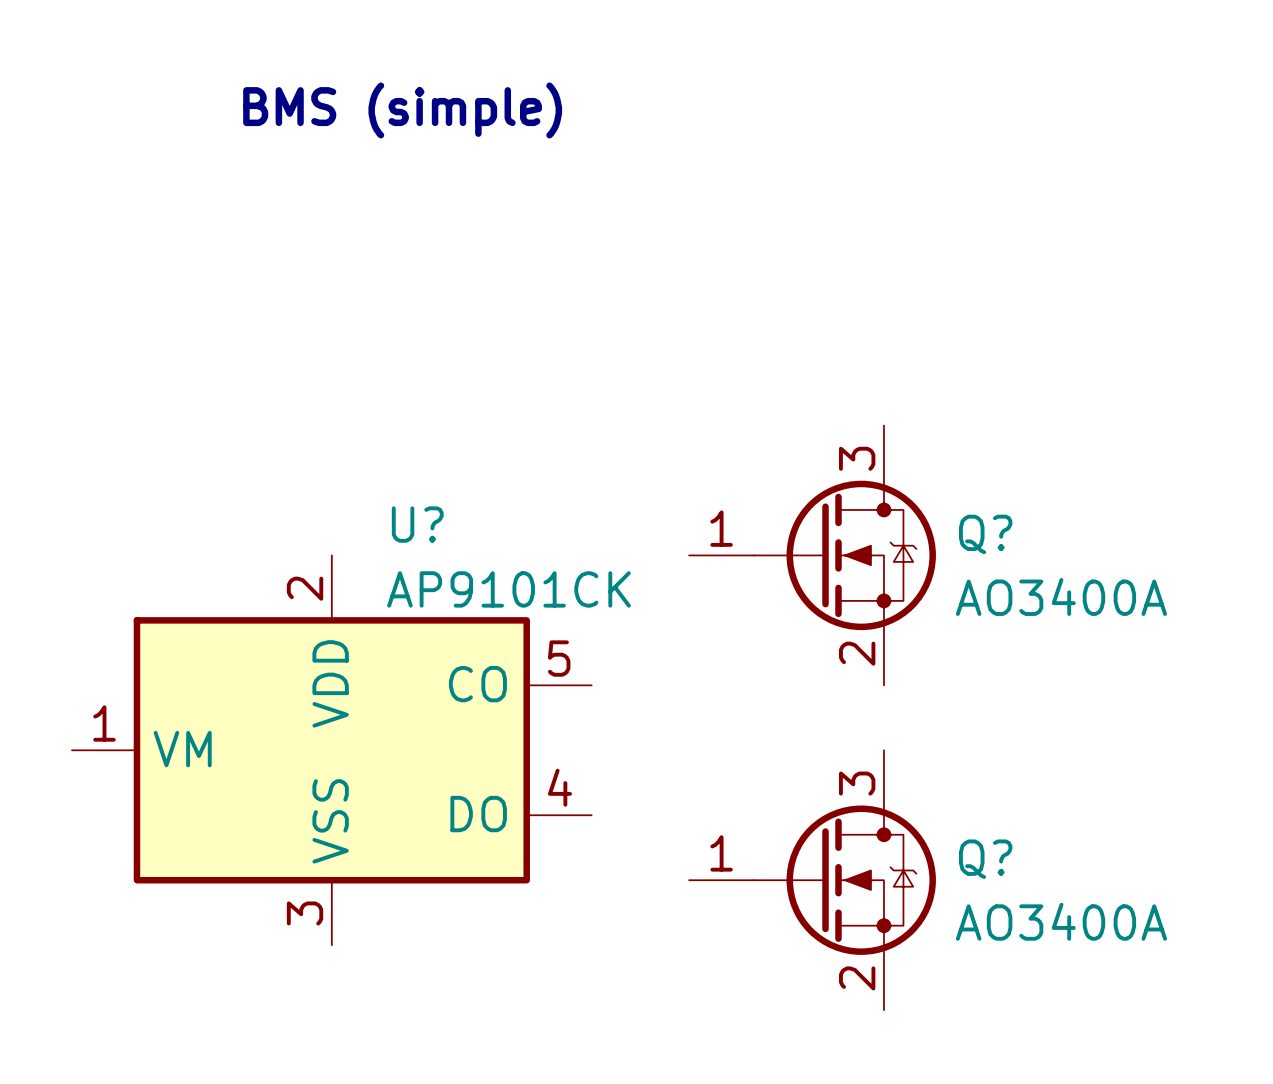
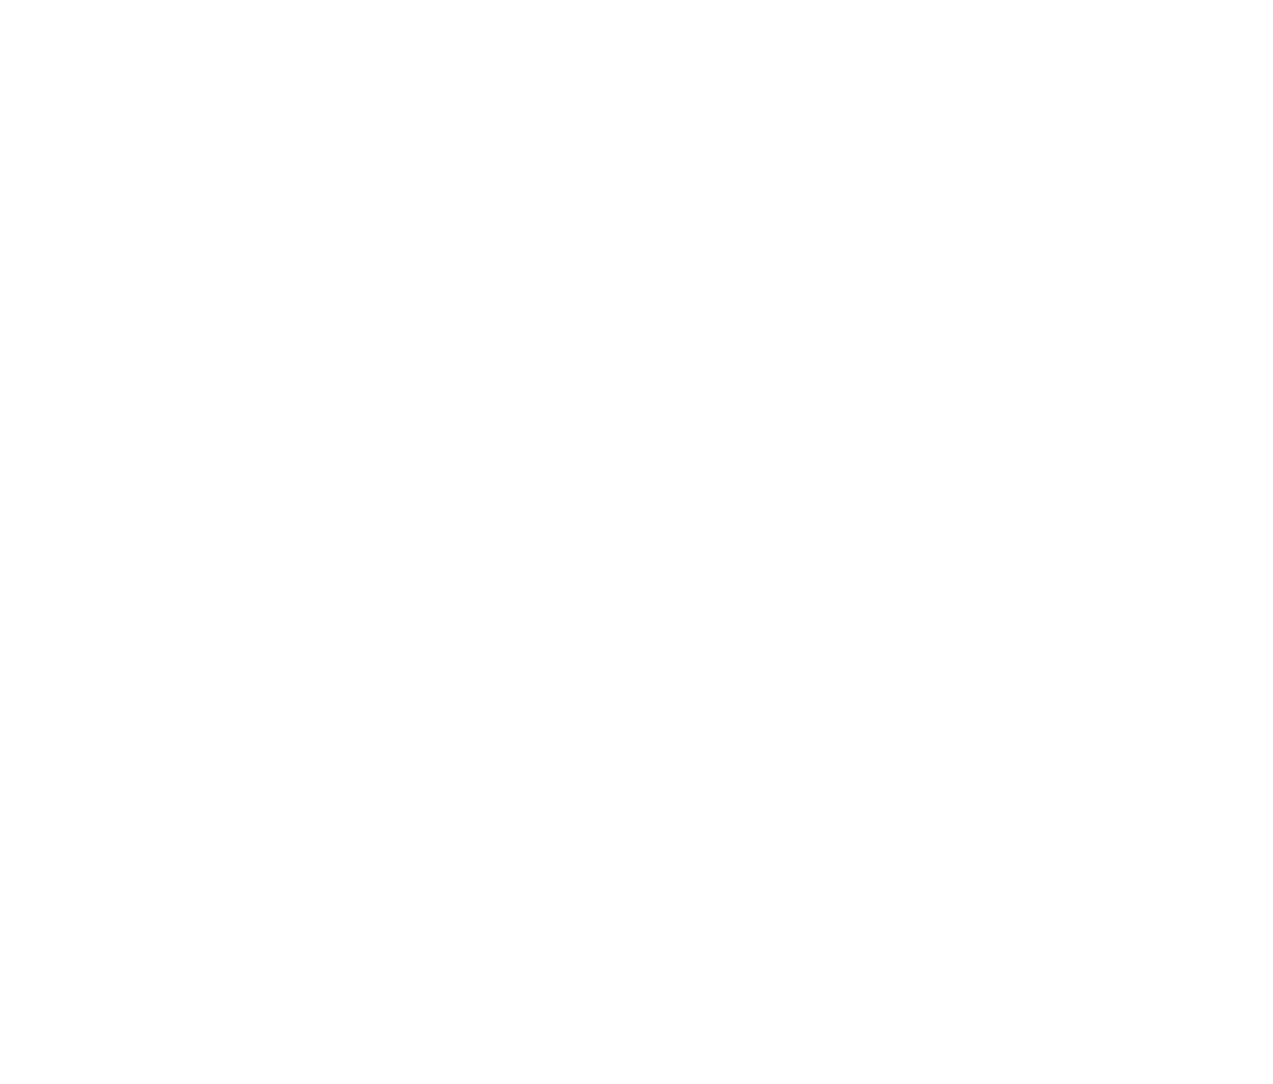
text: BMS (simple) (402, 110) -> none
Q?: AO3400A (812, 555) -> none
U?: AP9101CK (331, 750) -> none
Q?: AO3400A (812, 880) -> none

